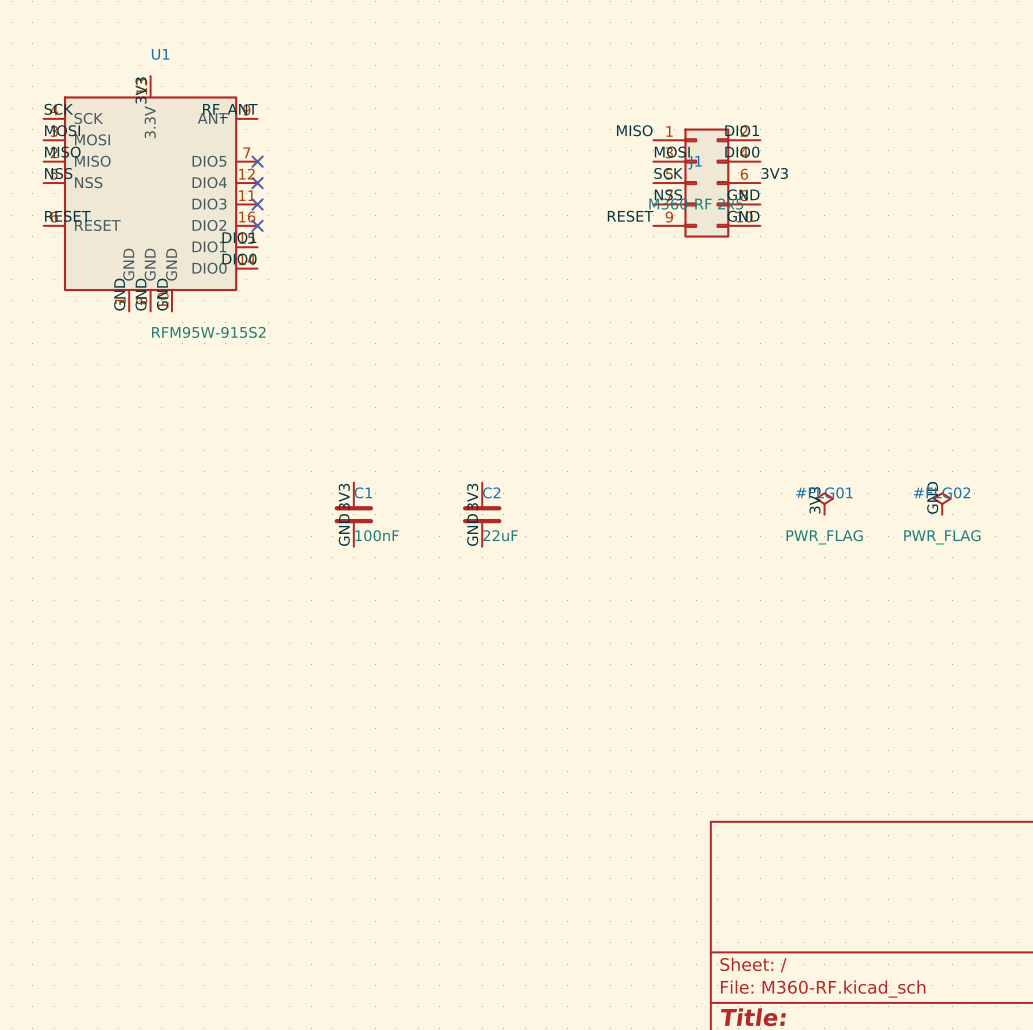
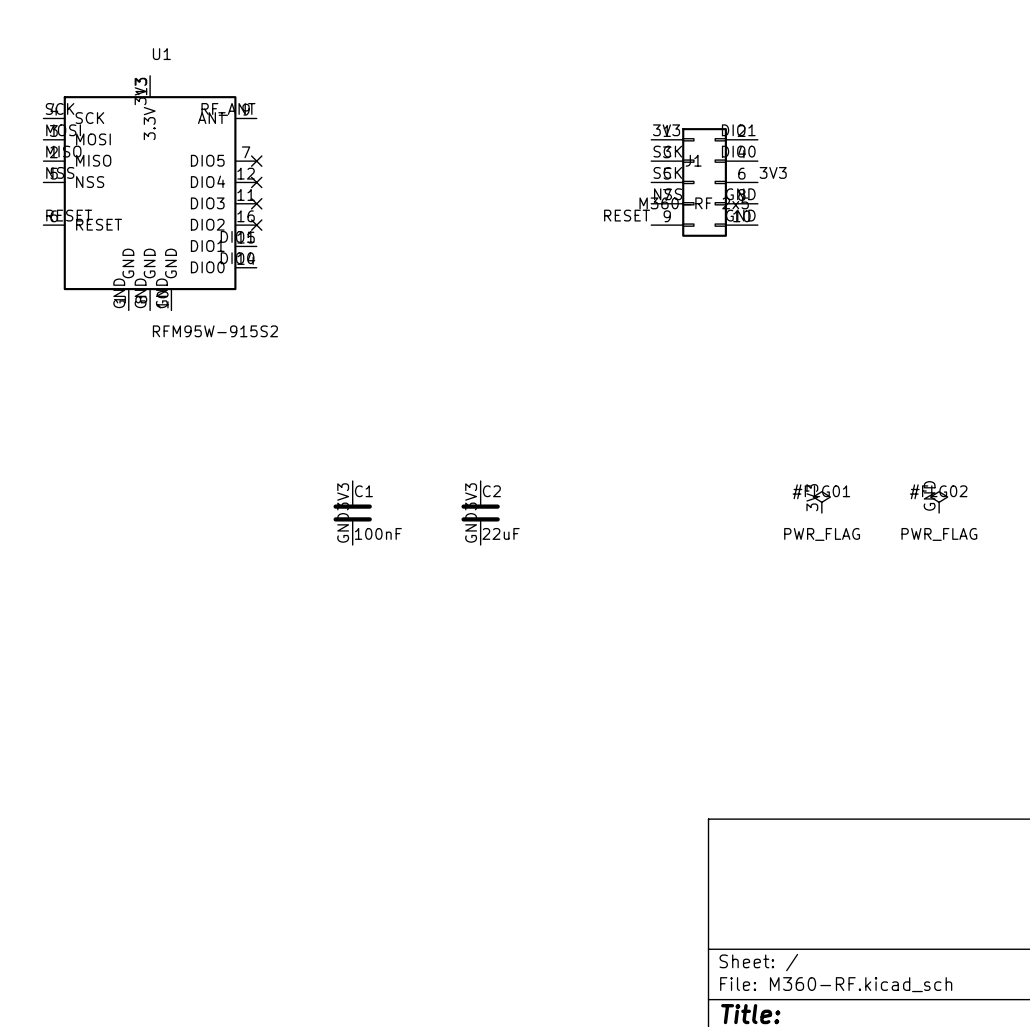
label: MISO (634, 130) -> 3V3 (666, 130)
label: MOSI (672, 152) -> SCK (667, 151)

